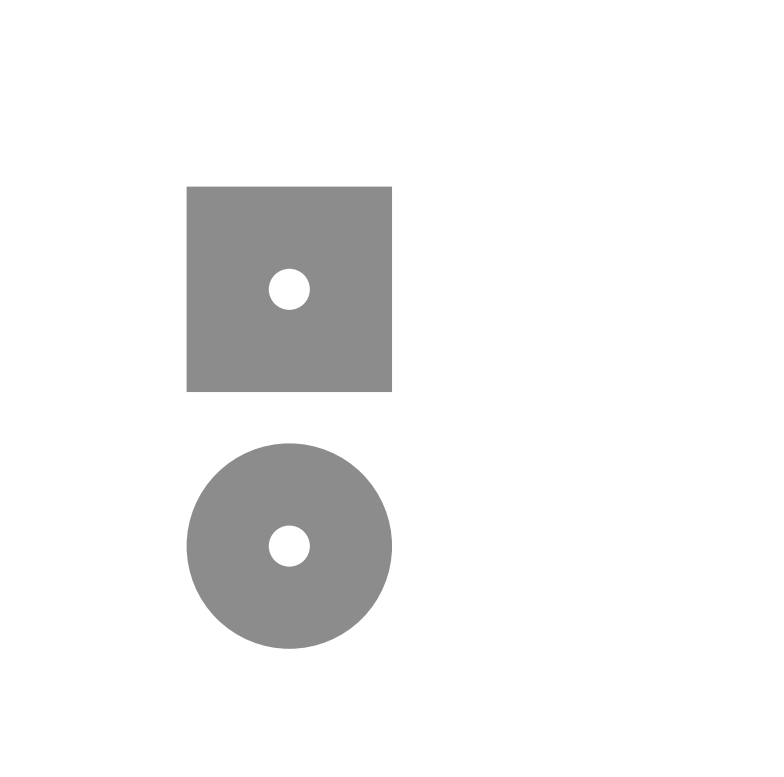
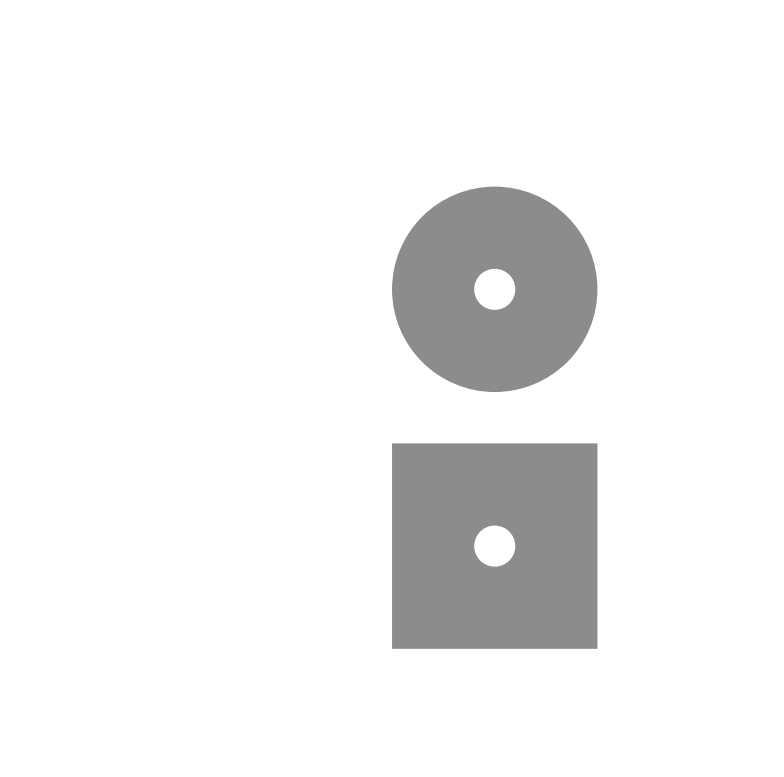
part rotation: 0° (289, 417) -> 180° (494, 417)

